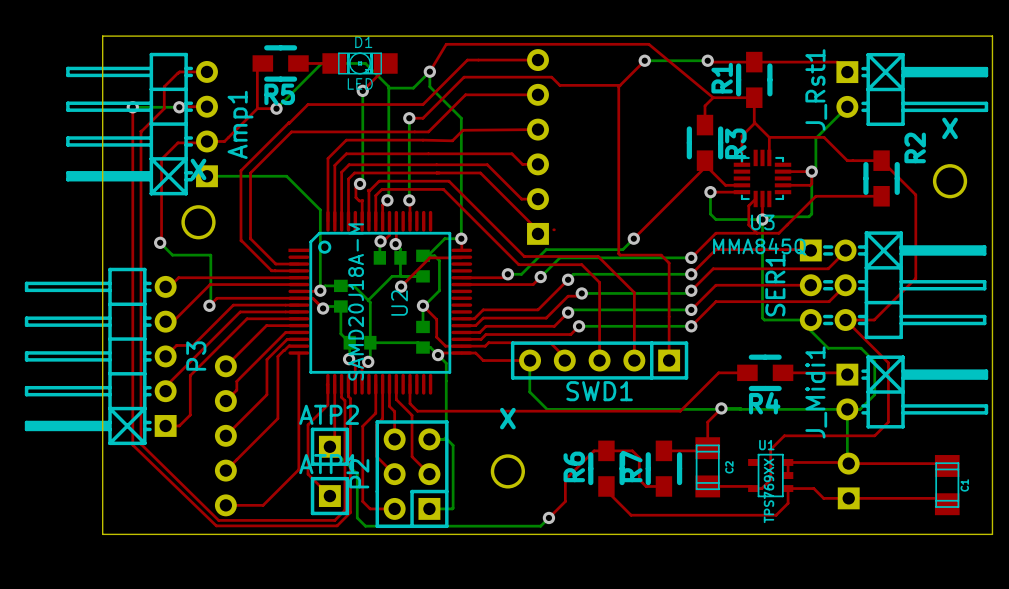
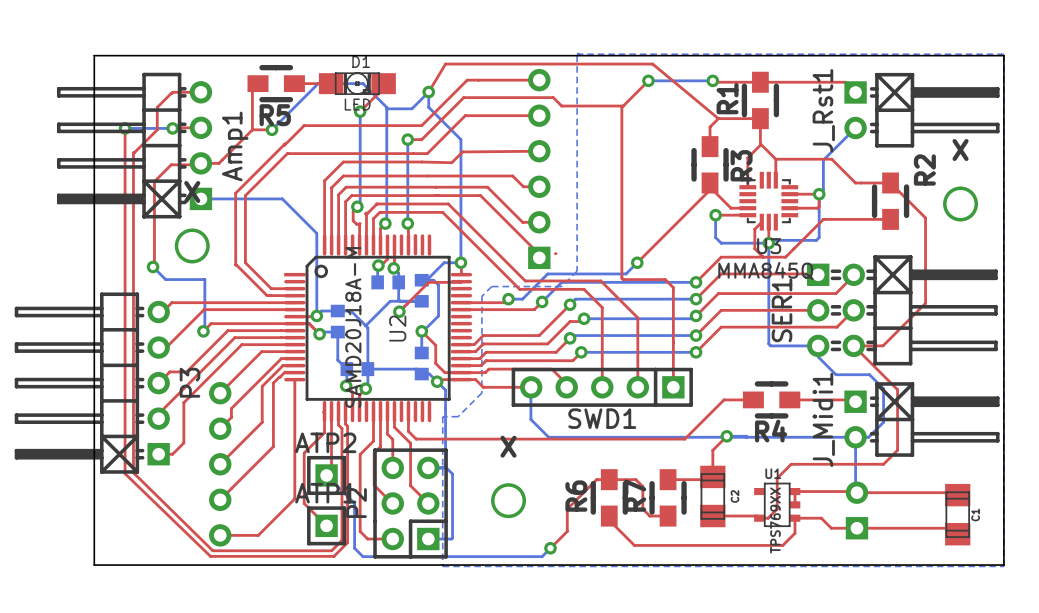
bottom zone outline: none -> (578, 52) (1003, 54) (1003, 566) (442, 566) (442, 416) (458, 416) (481, 392) (481, 296) (491, 286) (561, 286) (577, 271) (578, 52)

